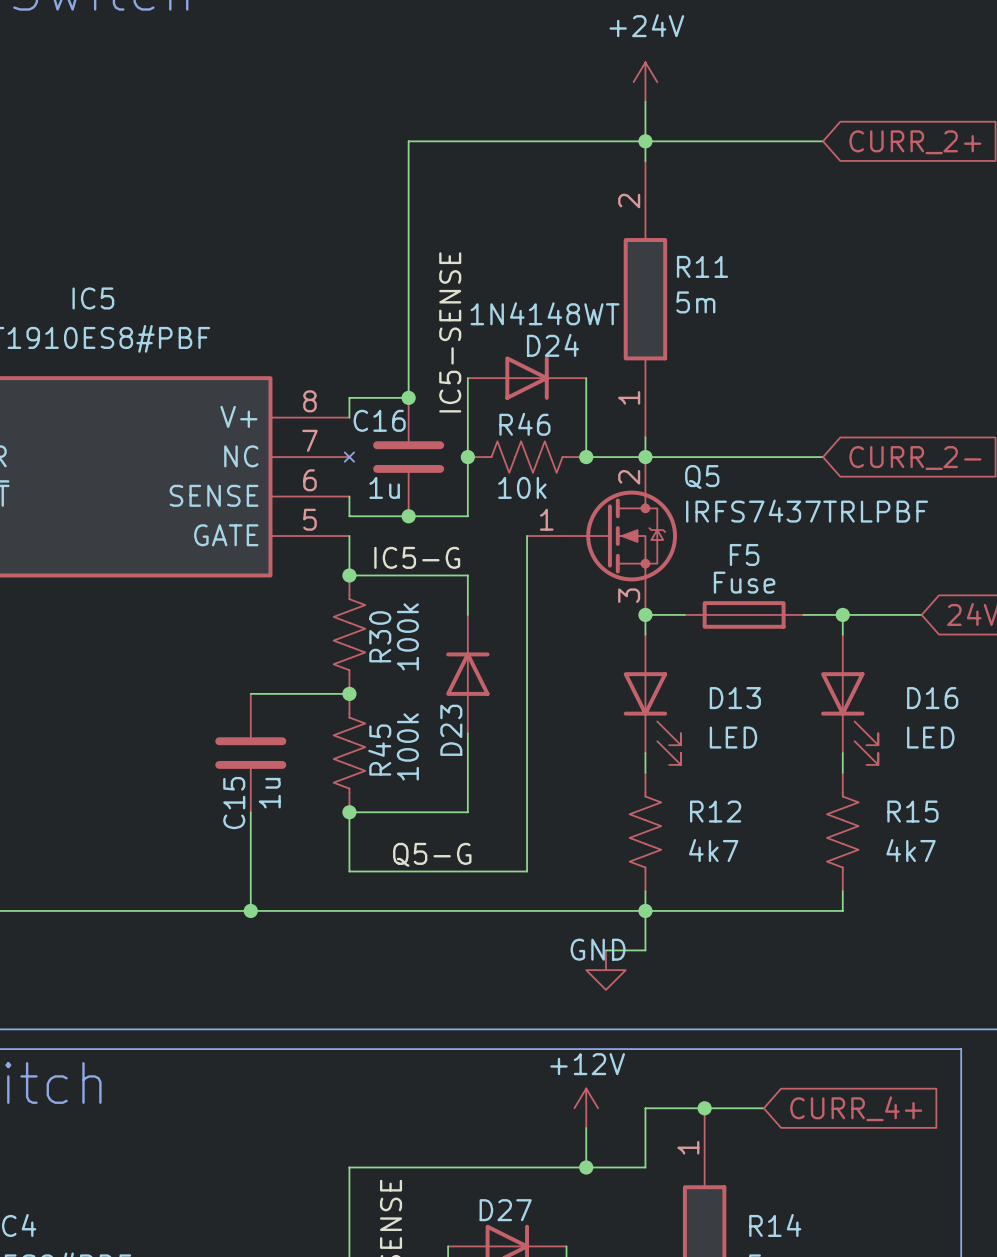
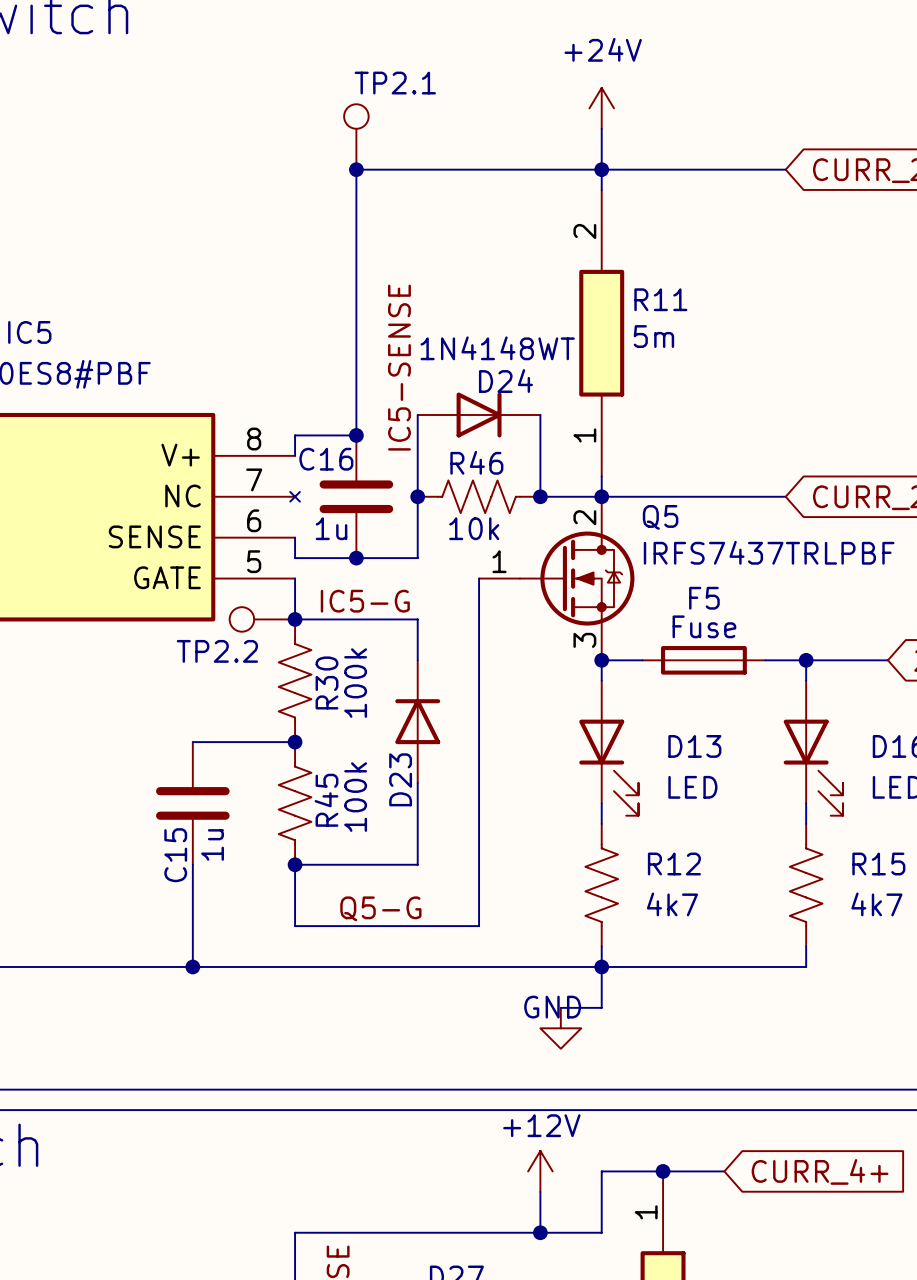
TP2.1: none -> (356, 136)
junction: none -> (356, 169)
TP2.2: none -> (262, 619)

